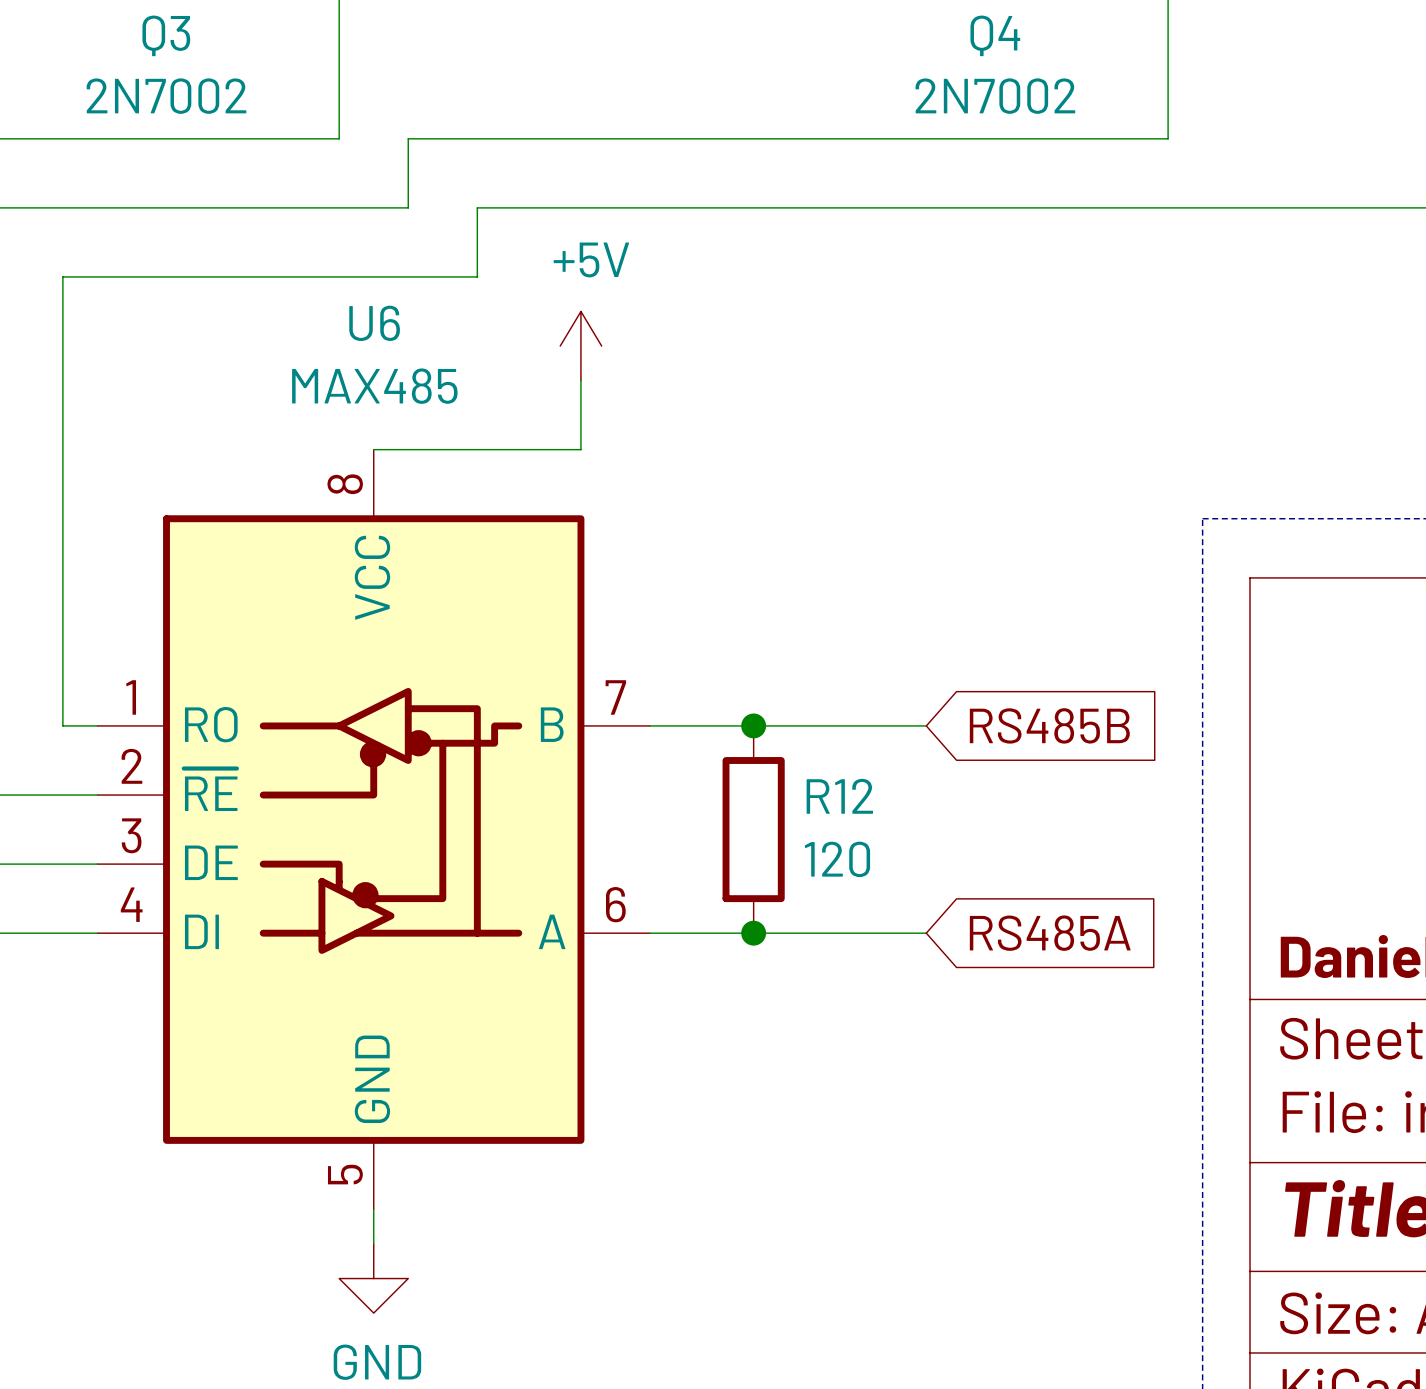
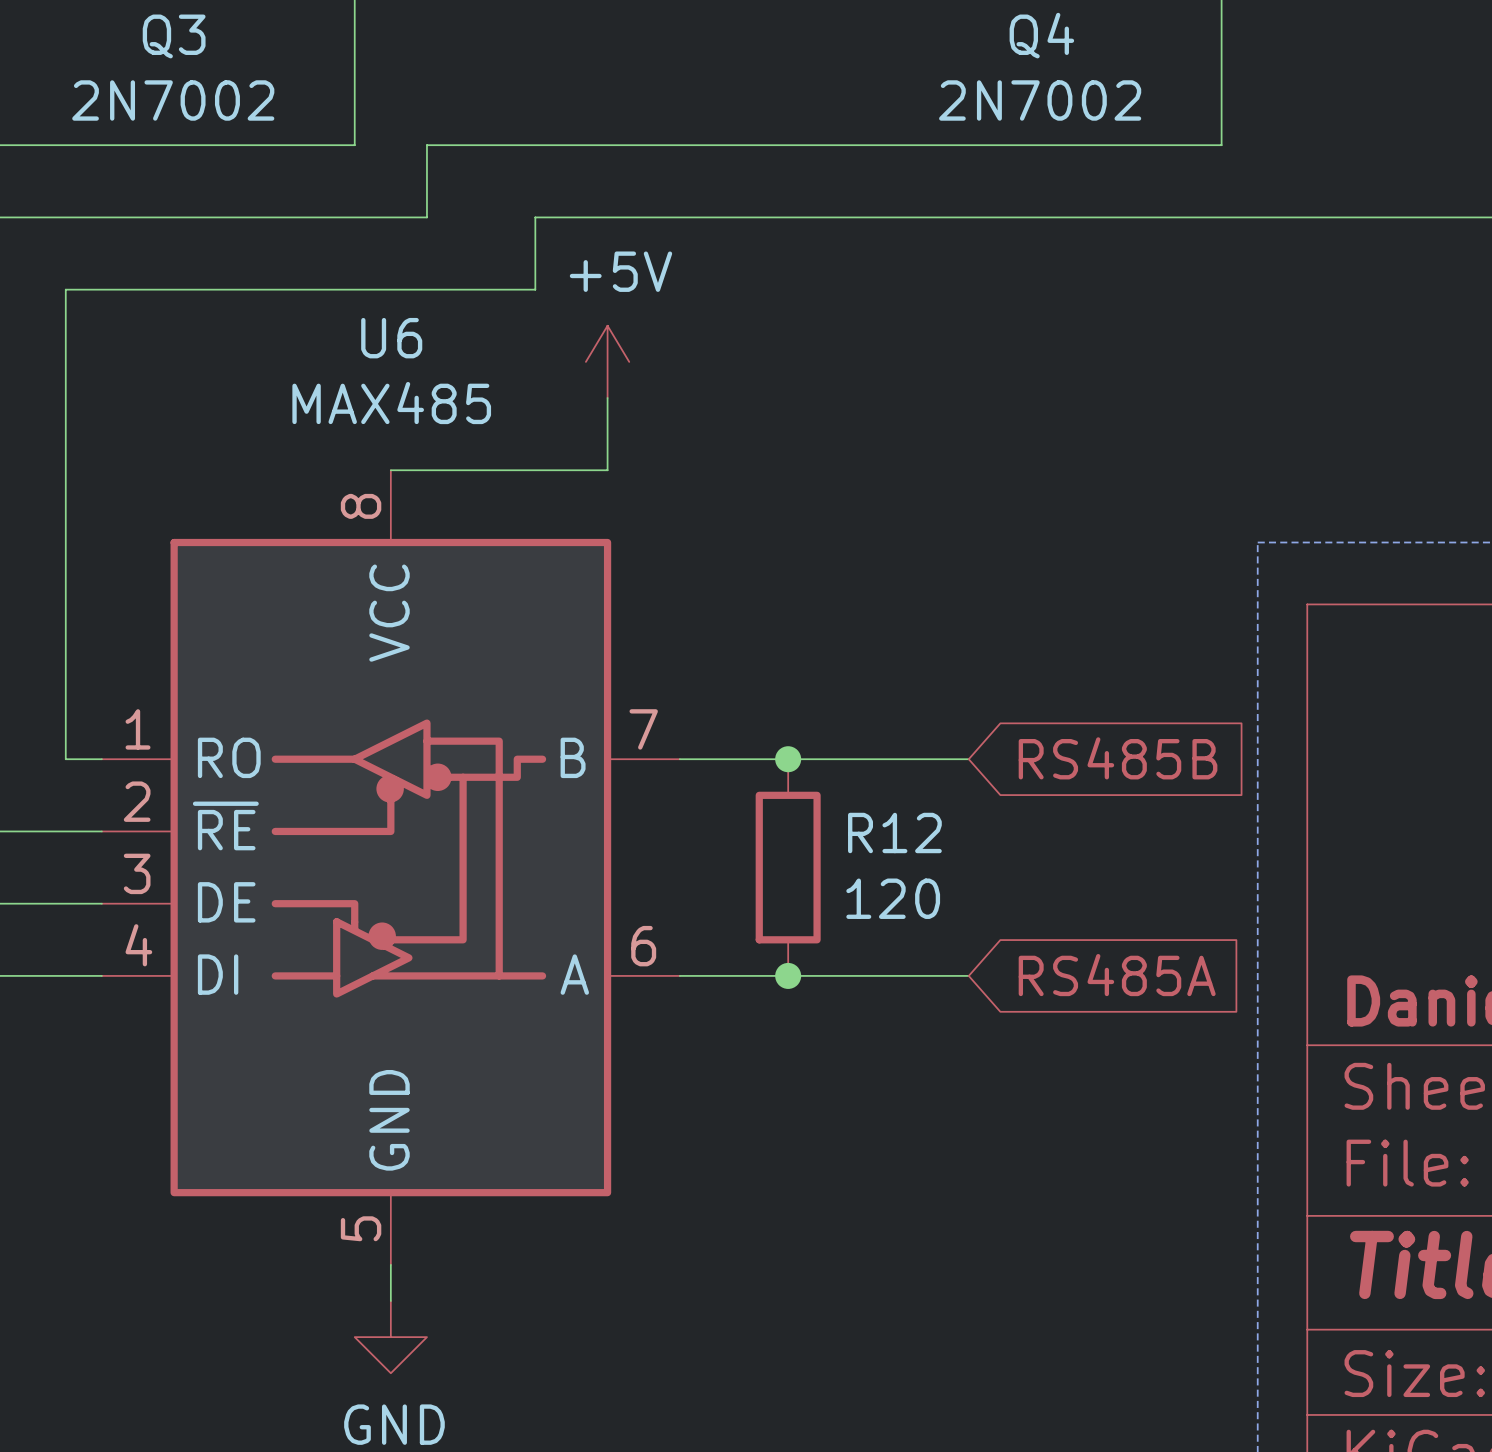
wire: (511, 207) (477, 207) (477, 276) -> (535, 217) (535, 289) (499, 289)

